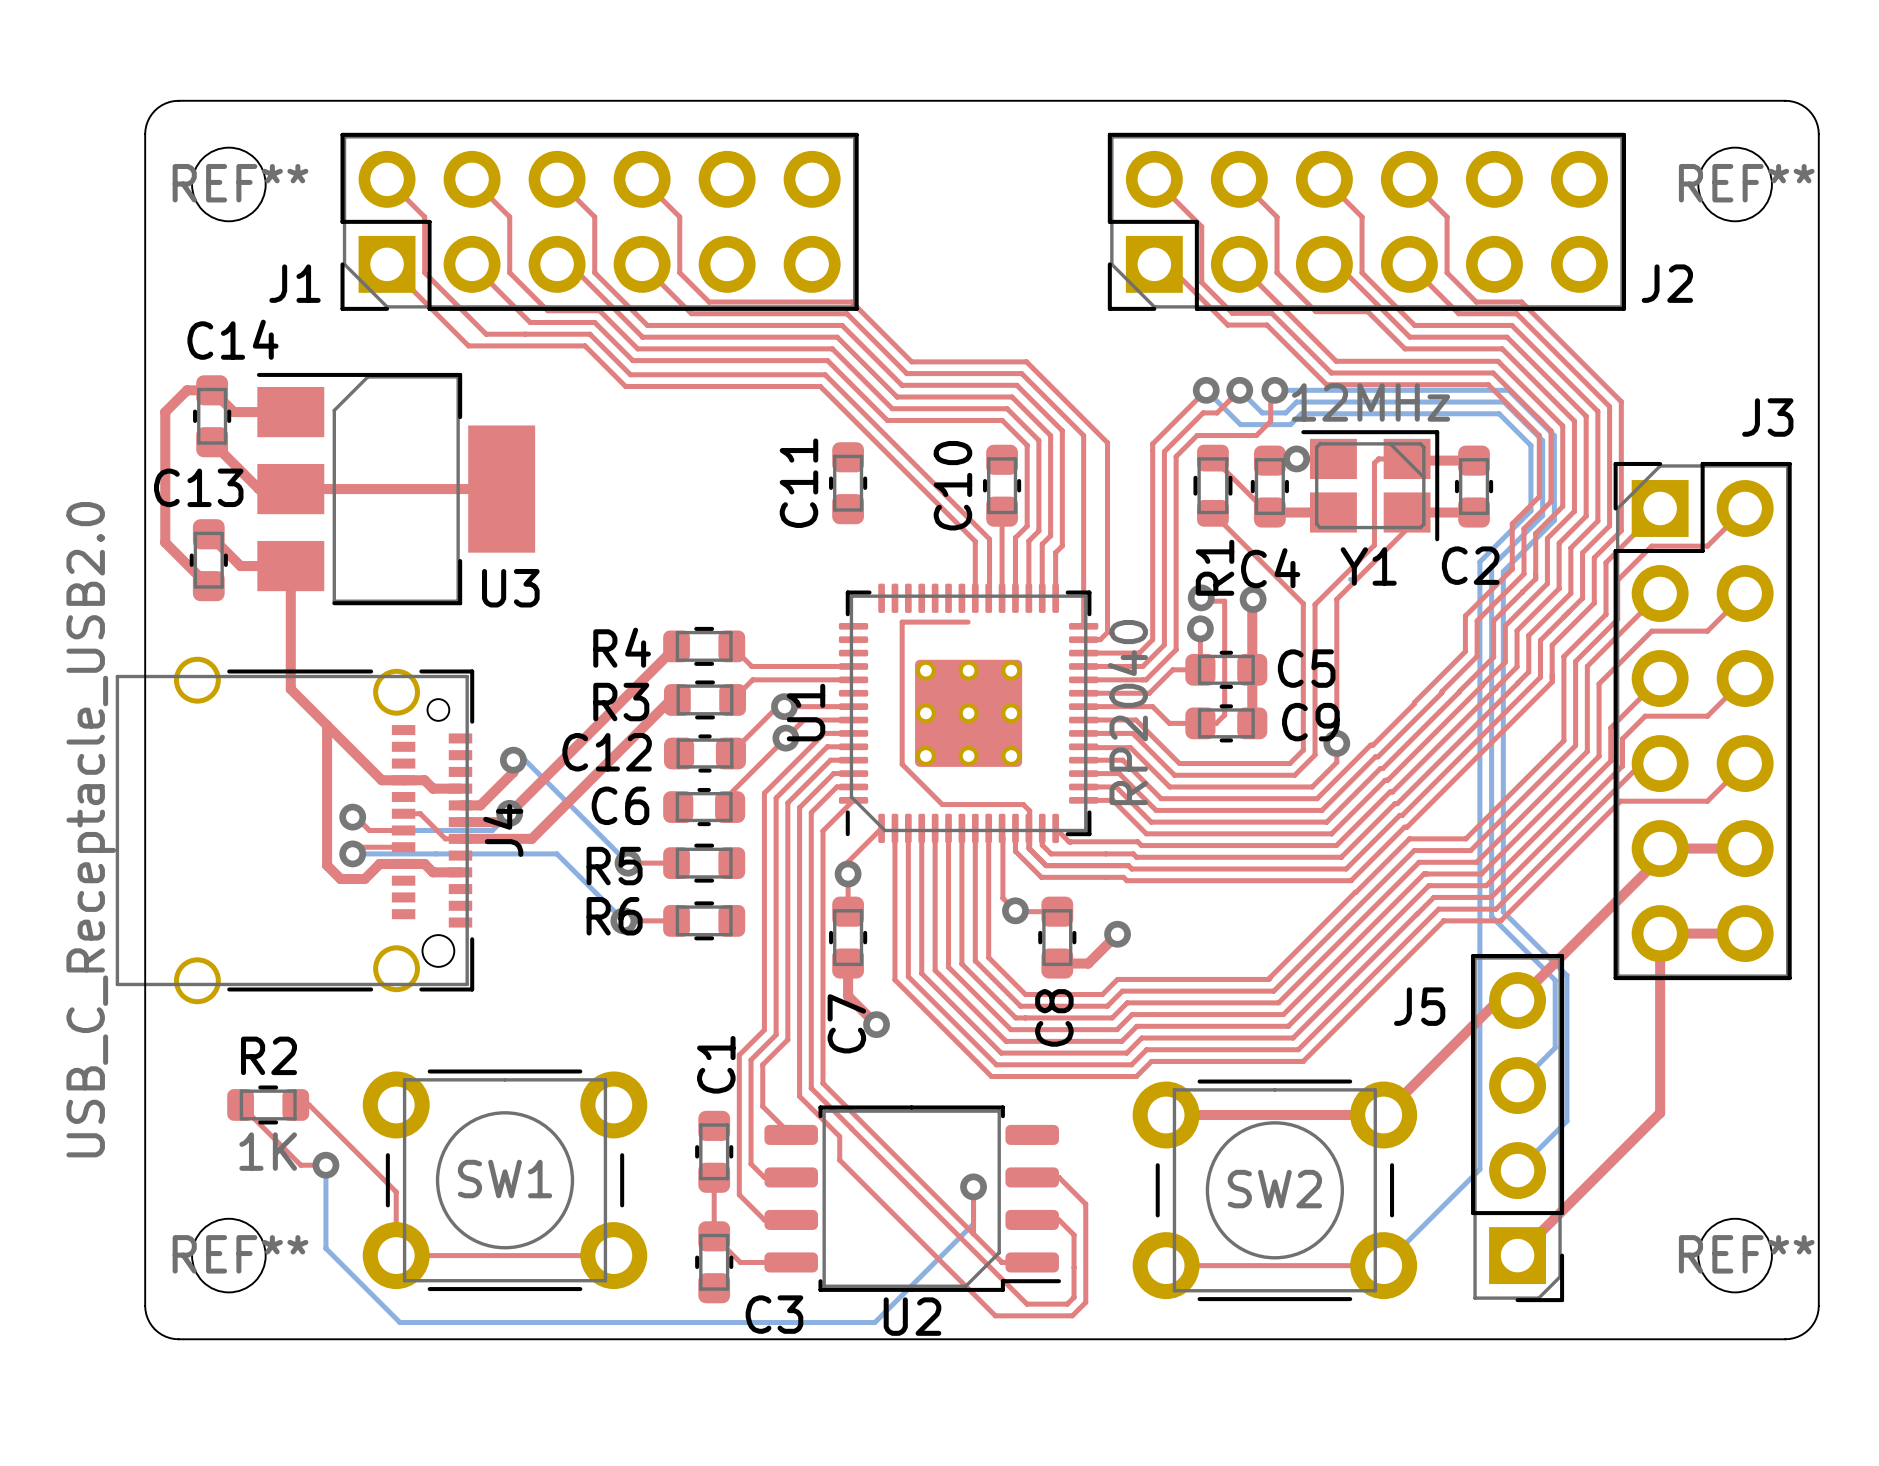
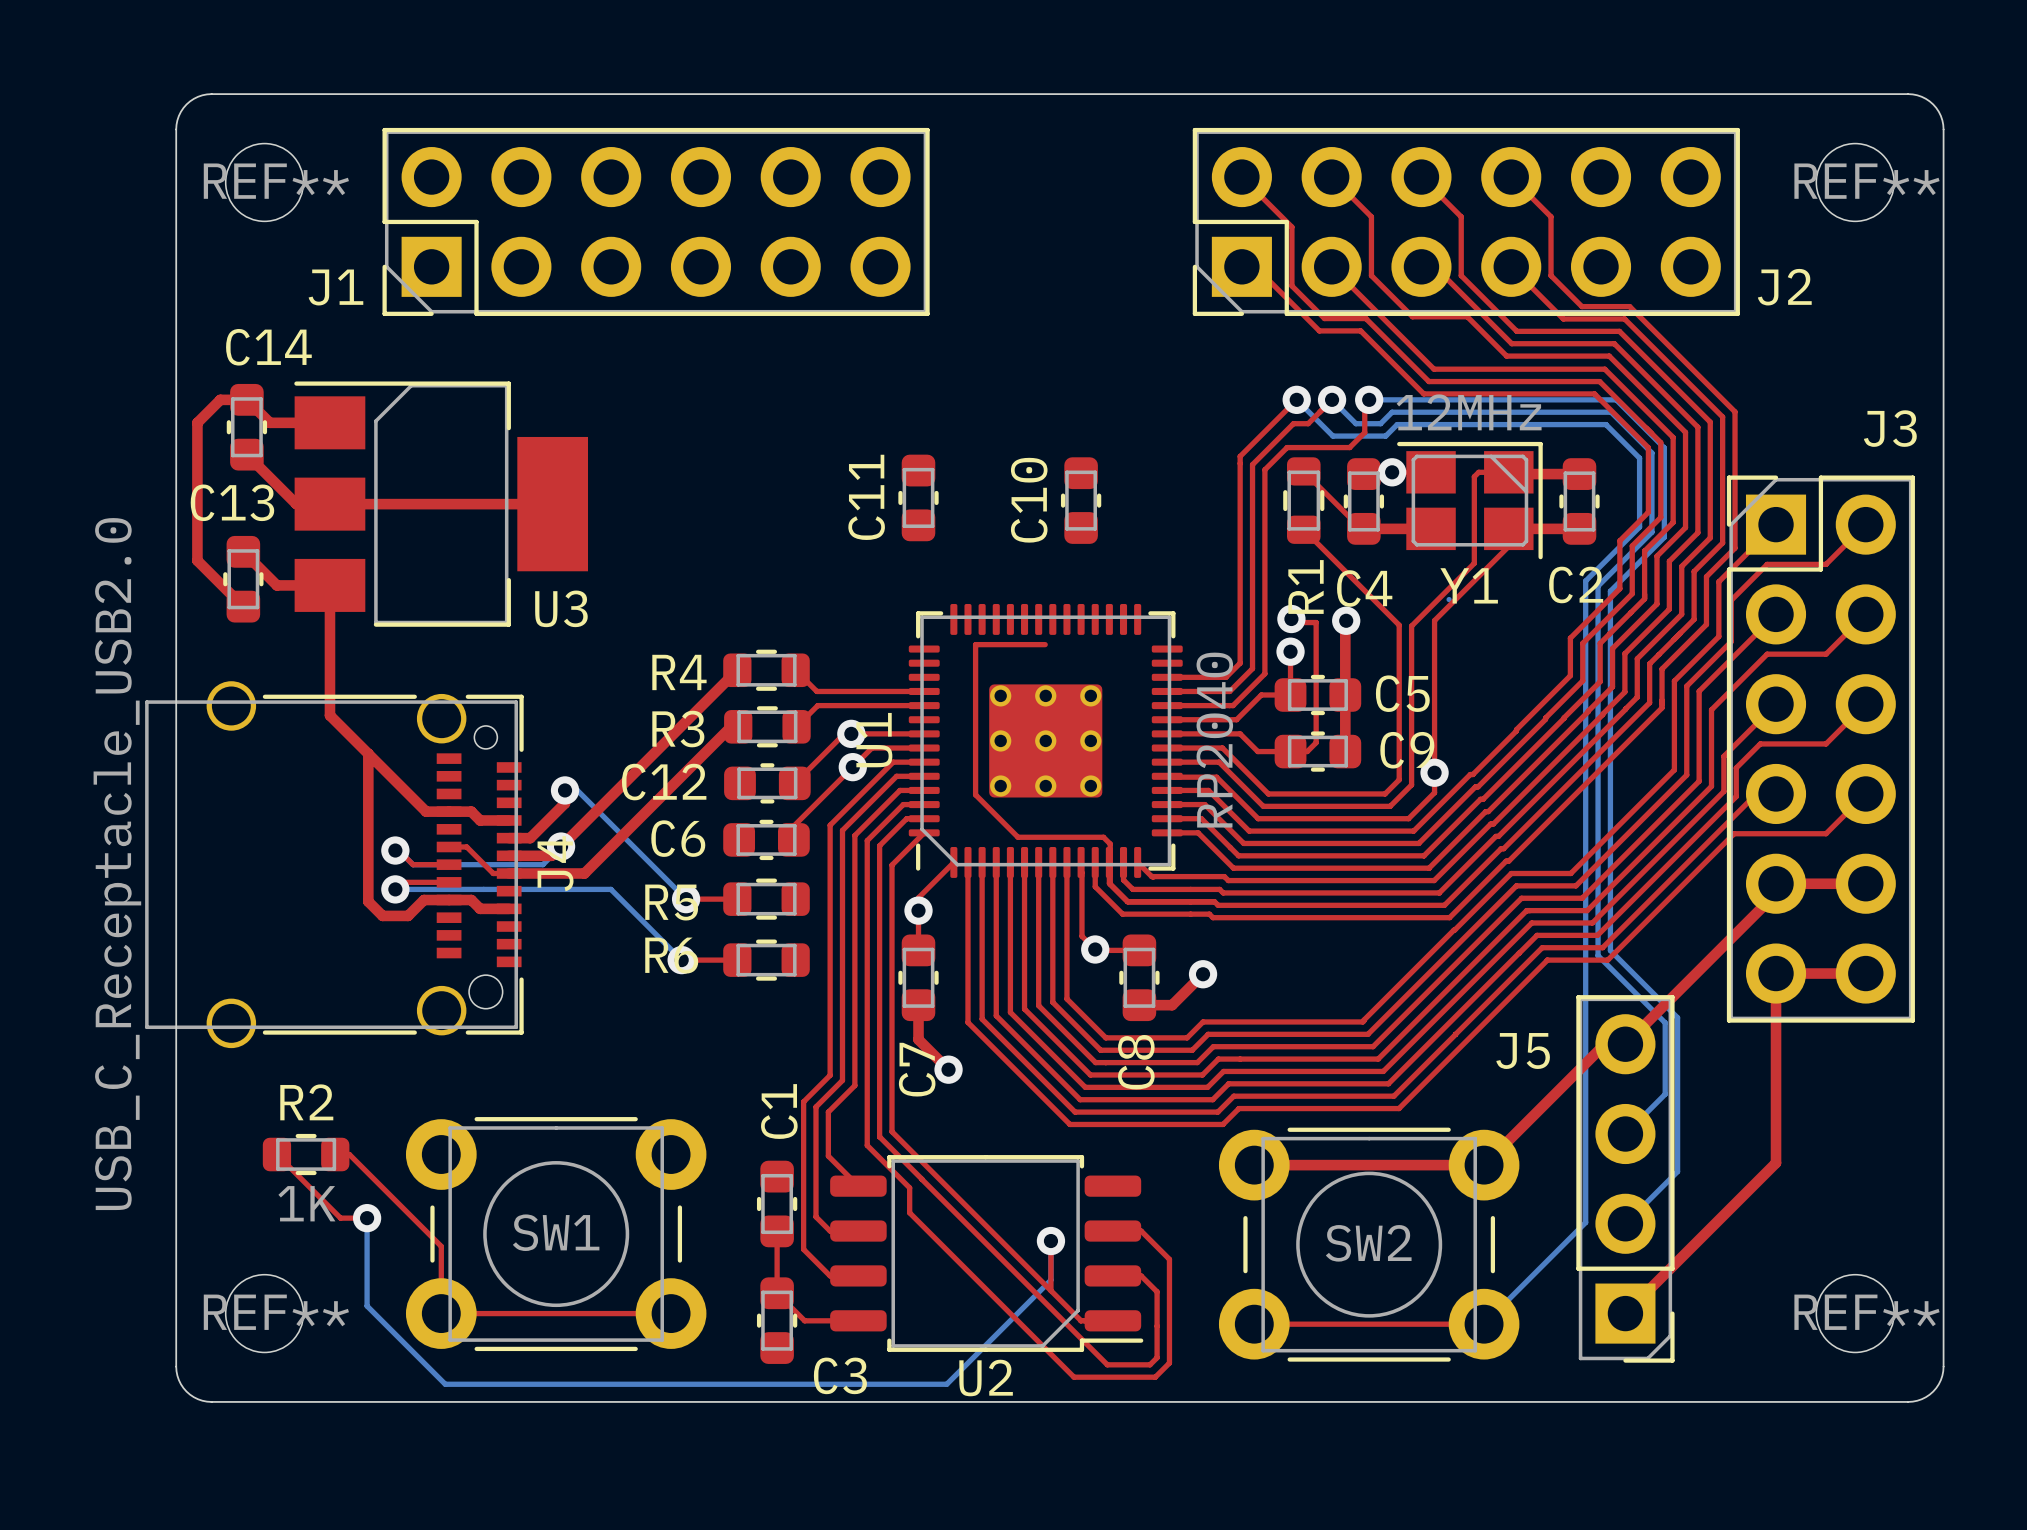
top track: (387, 179) (424, 217) (424, 272) (486, 334) (589, 334) (630, 374) (825, 374) (989, 539) (989, 597) -> none
top track: (472, 179) (509, 217) (509, 272) (547, 310) (599, 310) (637, 348) (832, 348) (892, 408) (1007, 408) (1038, 440) (1038, 530) (1028, 541) (1028, 598) -> none
top track: (557, 179) (594, 217) (594, 272) (647, 325) (842, 325) (901, 385) (1016, 385) (1062, 430) (1062, 545) (1055, 552) (1055, 598) -> none
top track: (642, 179) (679, 217) (679, 272) (709, 302) (851, 302) (911, 361) (1026, 361) (1107, 442) (1107, 632) (1100, 639) (1083, 639) -> none
top track: (387, 264) (468, 345) (585, 345) (625, 386) (820, 386) (975, 541) (975, 598) -> none
top track: (472, 264) (530, 322) (594, 322) (632, 360) (827, 360) (887, 420) (1002, 420) (1027, 445) (1027, 526) (1015, 537) (1015, 598) -> none
top track: (557, 264) (569, 264) (642, 337) (837, 337) (897, 397) (1012, 397) (1050, 435) (1050, 535) (1042, 544) (1042, 598) -> none
top track: (642, 264) (691, 313) (847, 313) (906, 373) (1021, 373) (1083, 435) (1083, 626) -> none
top track: (1002, 511) (1002, 598) -> none

